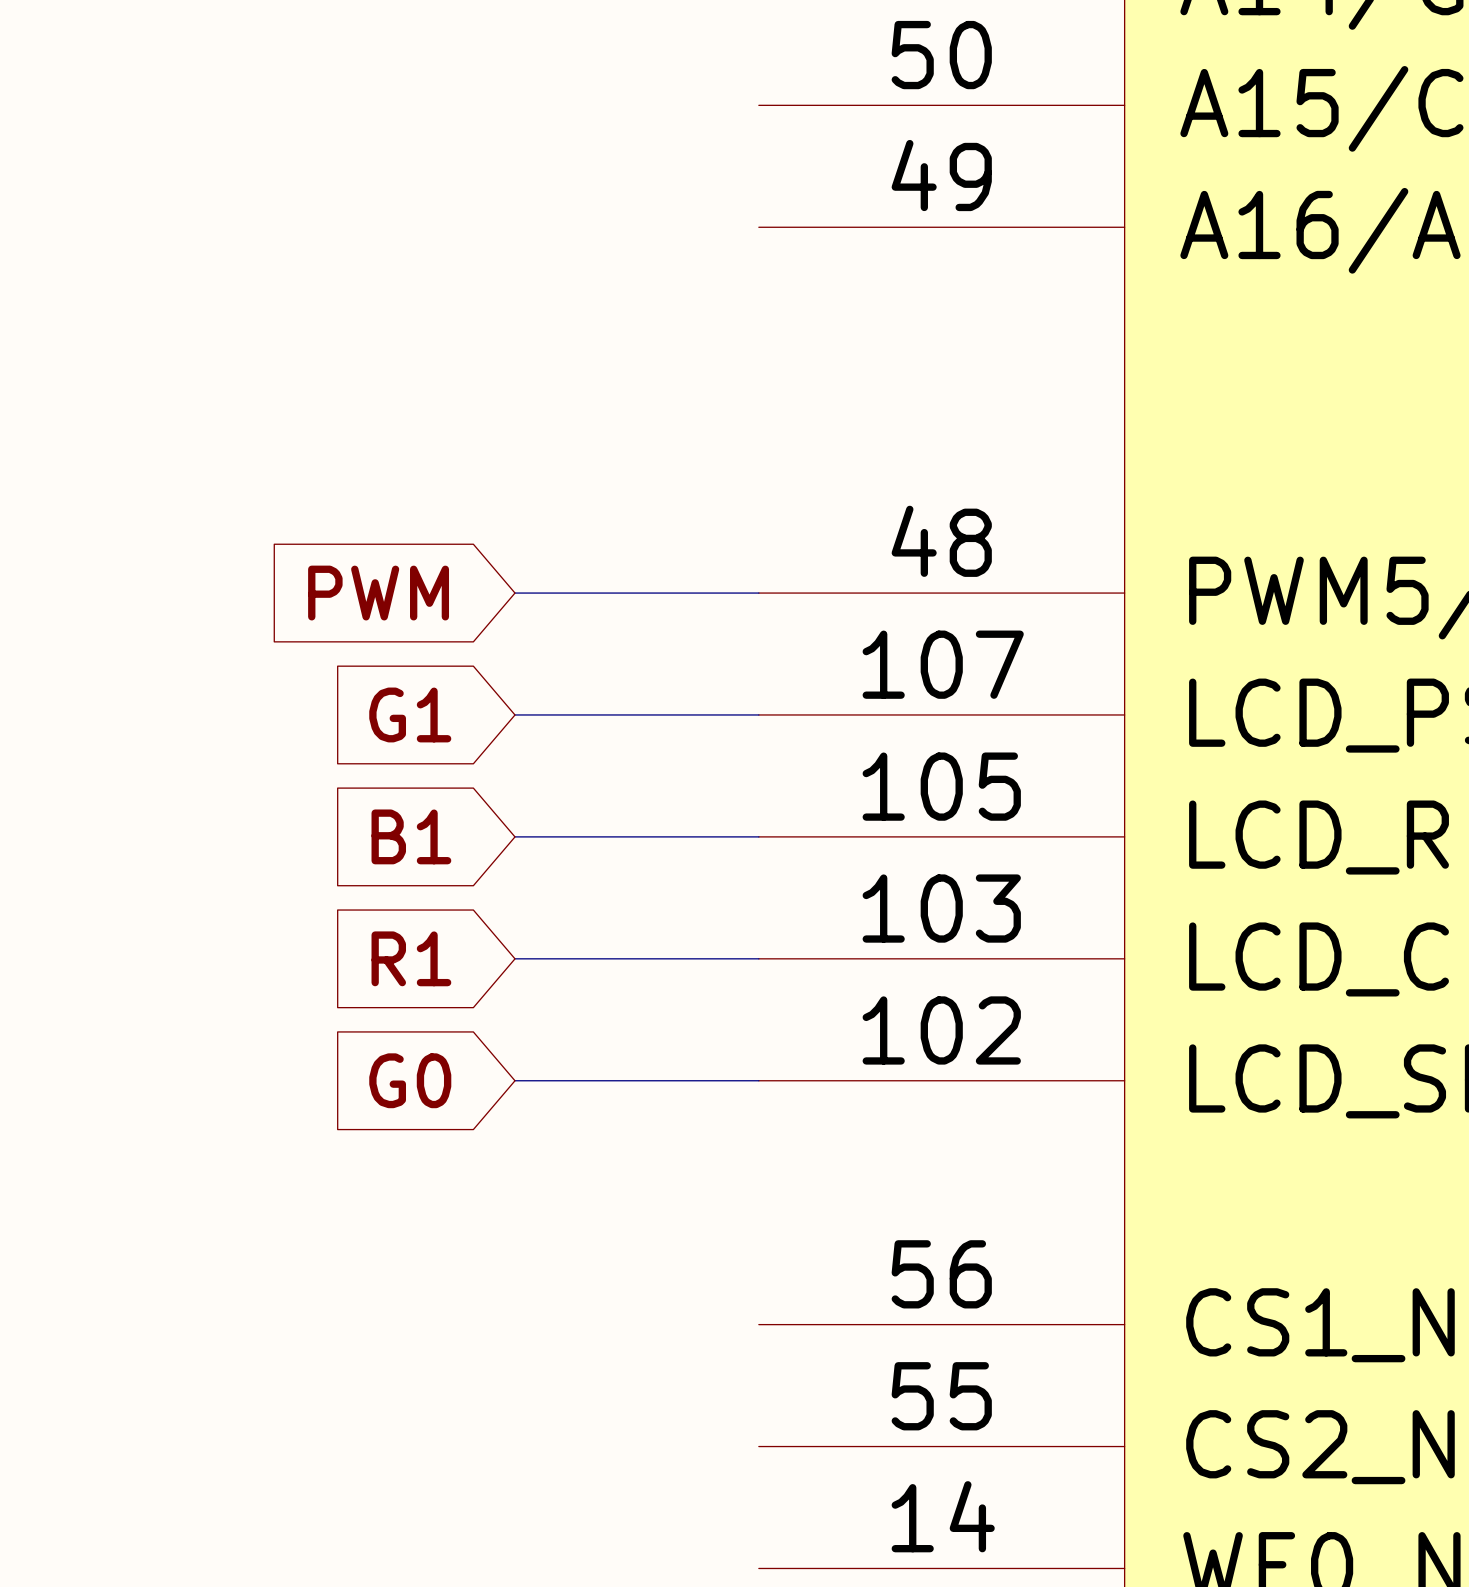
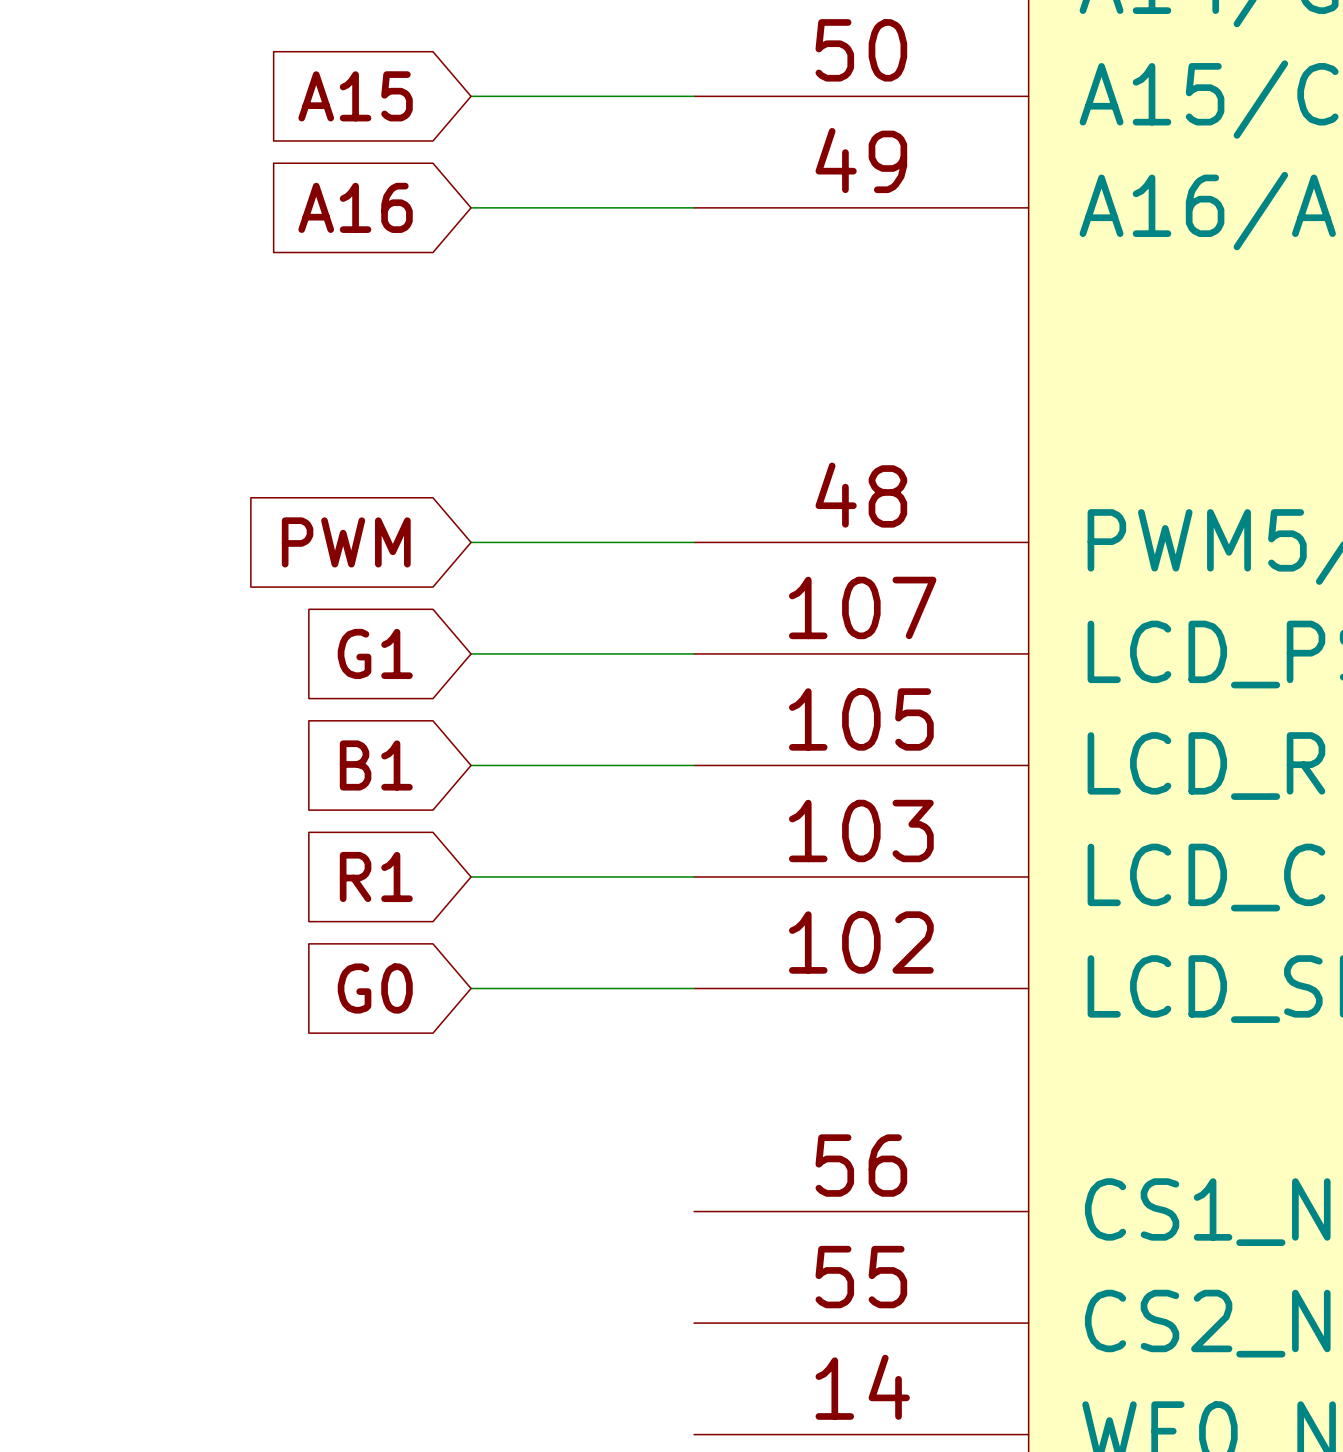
global label: none -> A15 (355, 96)
wire: none -> (471, 96) (694, 96)
global label: none -> A16 (355, 207)
wire: none -> (471, 207) (694, 207)

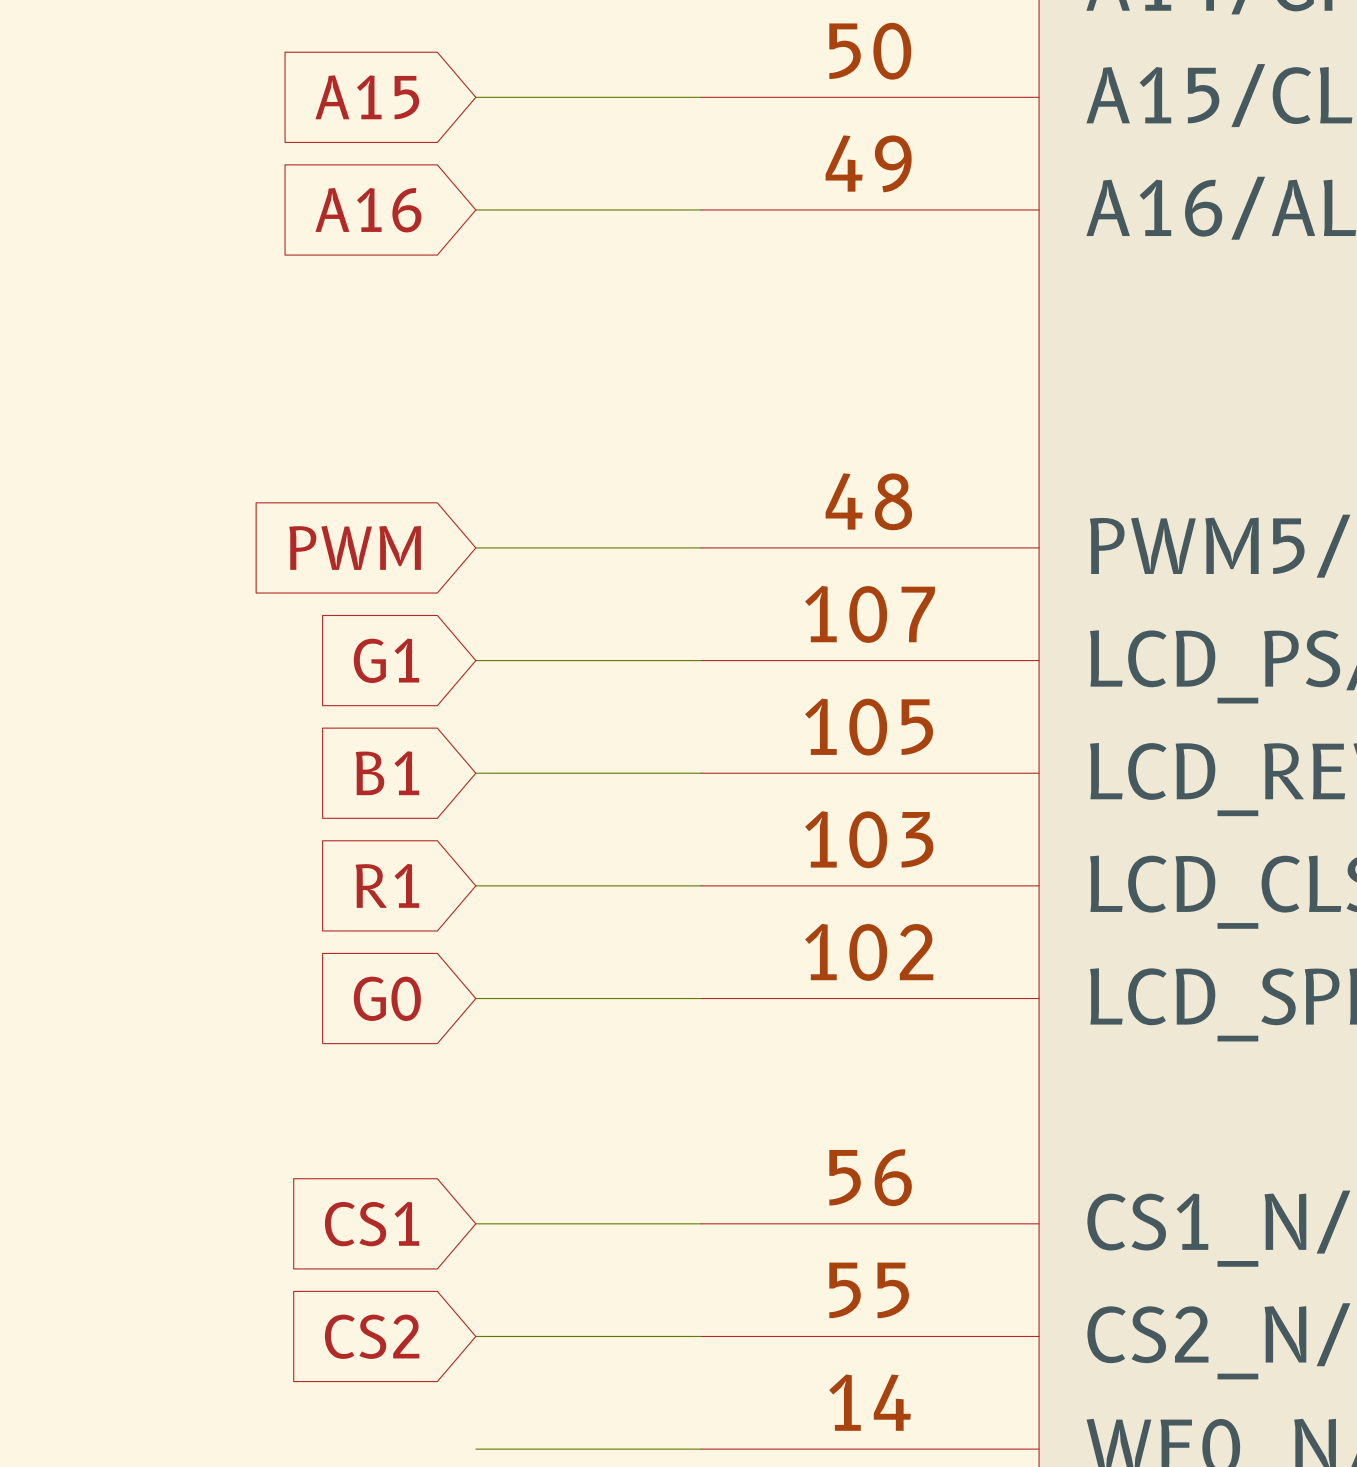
global label: none -> CS1 (372, 1224)
wire: none -> (475, 1223) (701, 1223)
global label: none -> CS2 (372, 1336)
wire: none -> (475, 1336) (701, 1336)
wire: none -> (475, 1449) (701, 1449)

